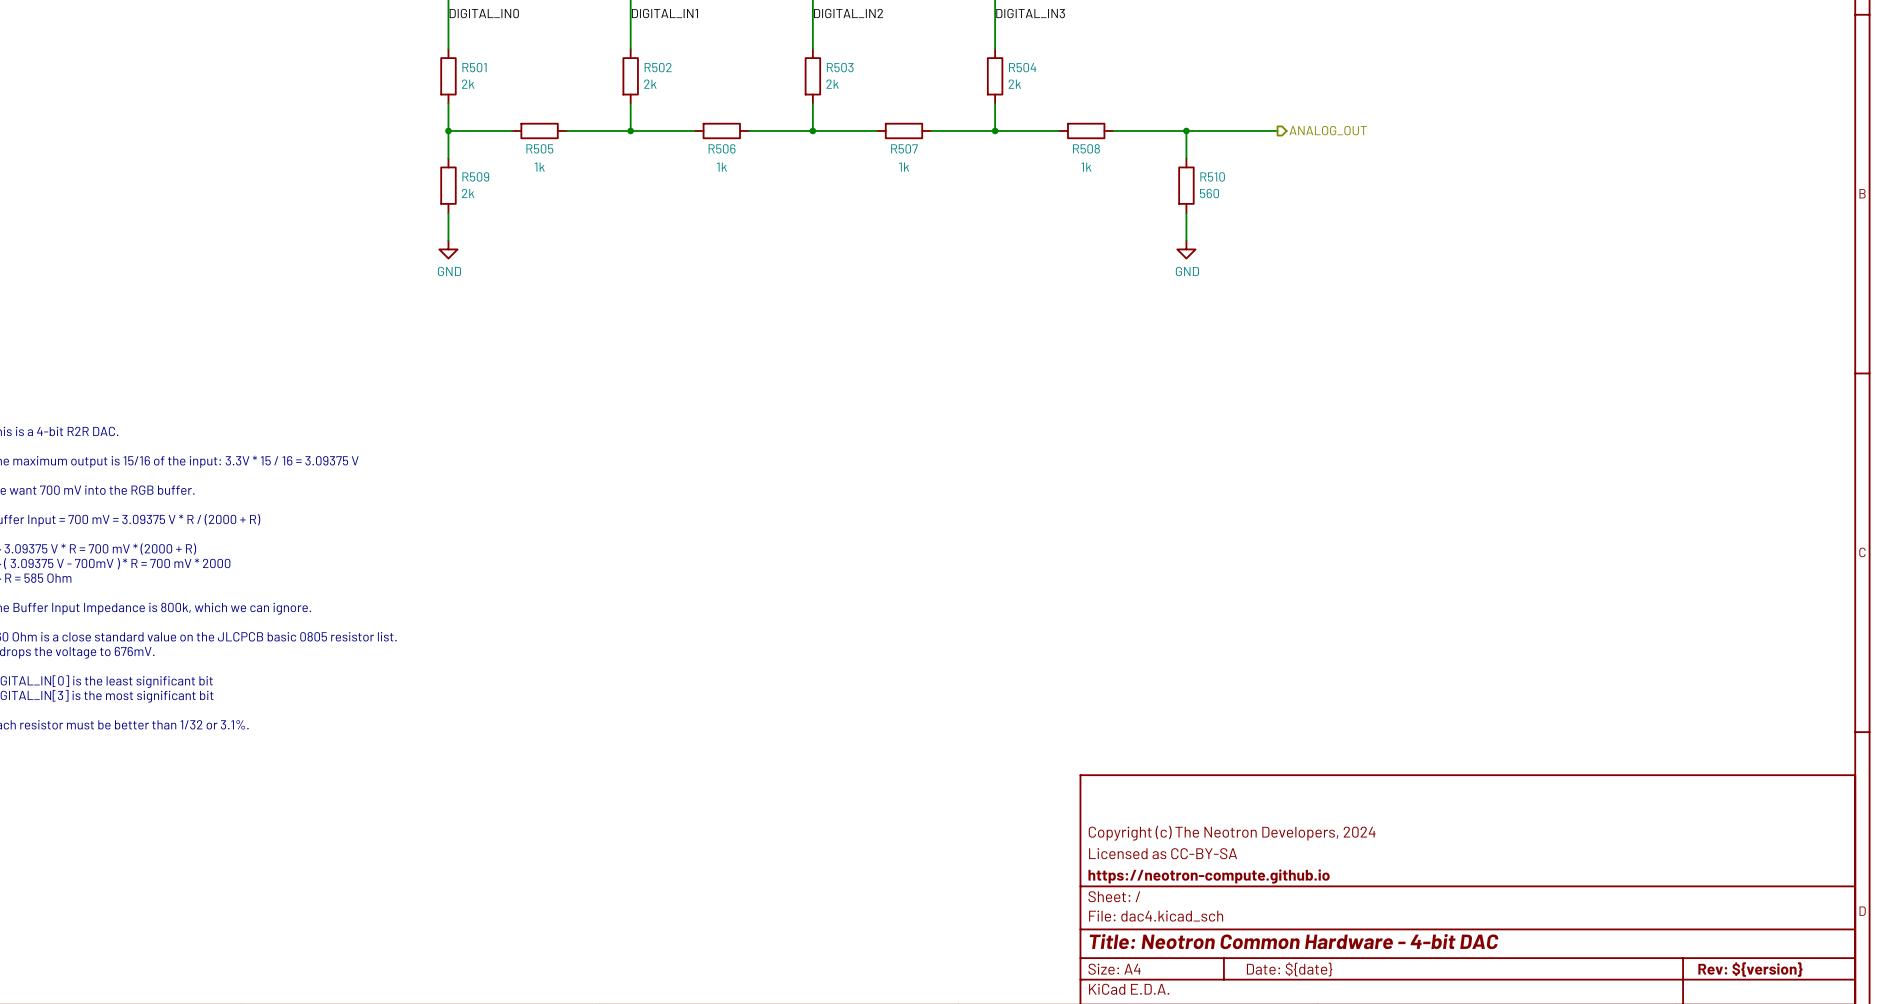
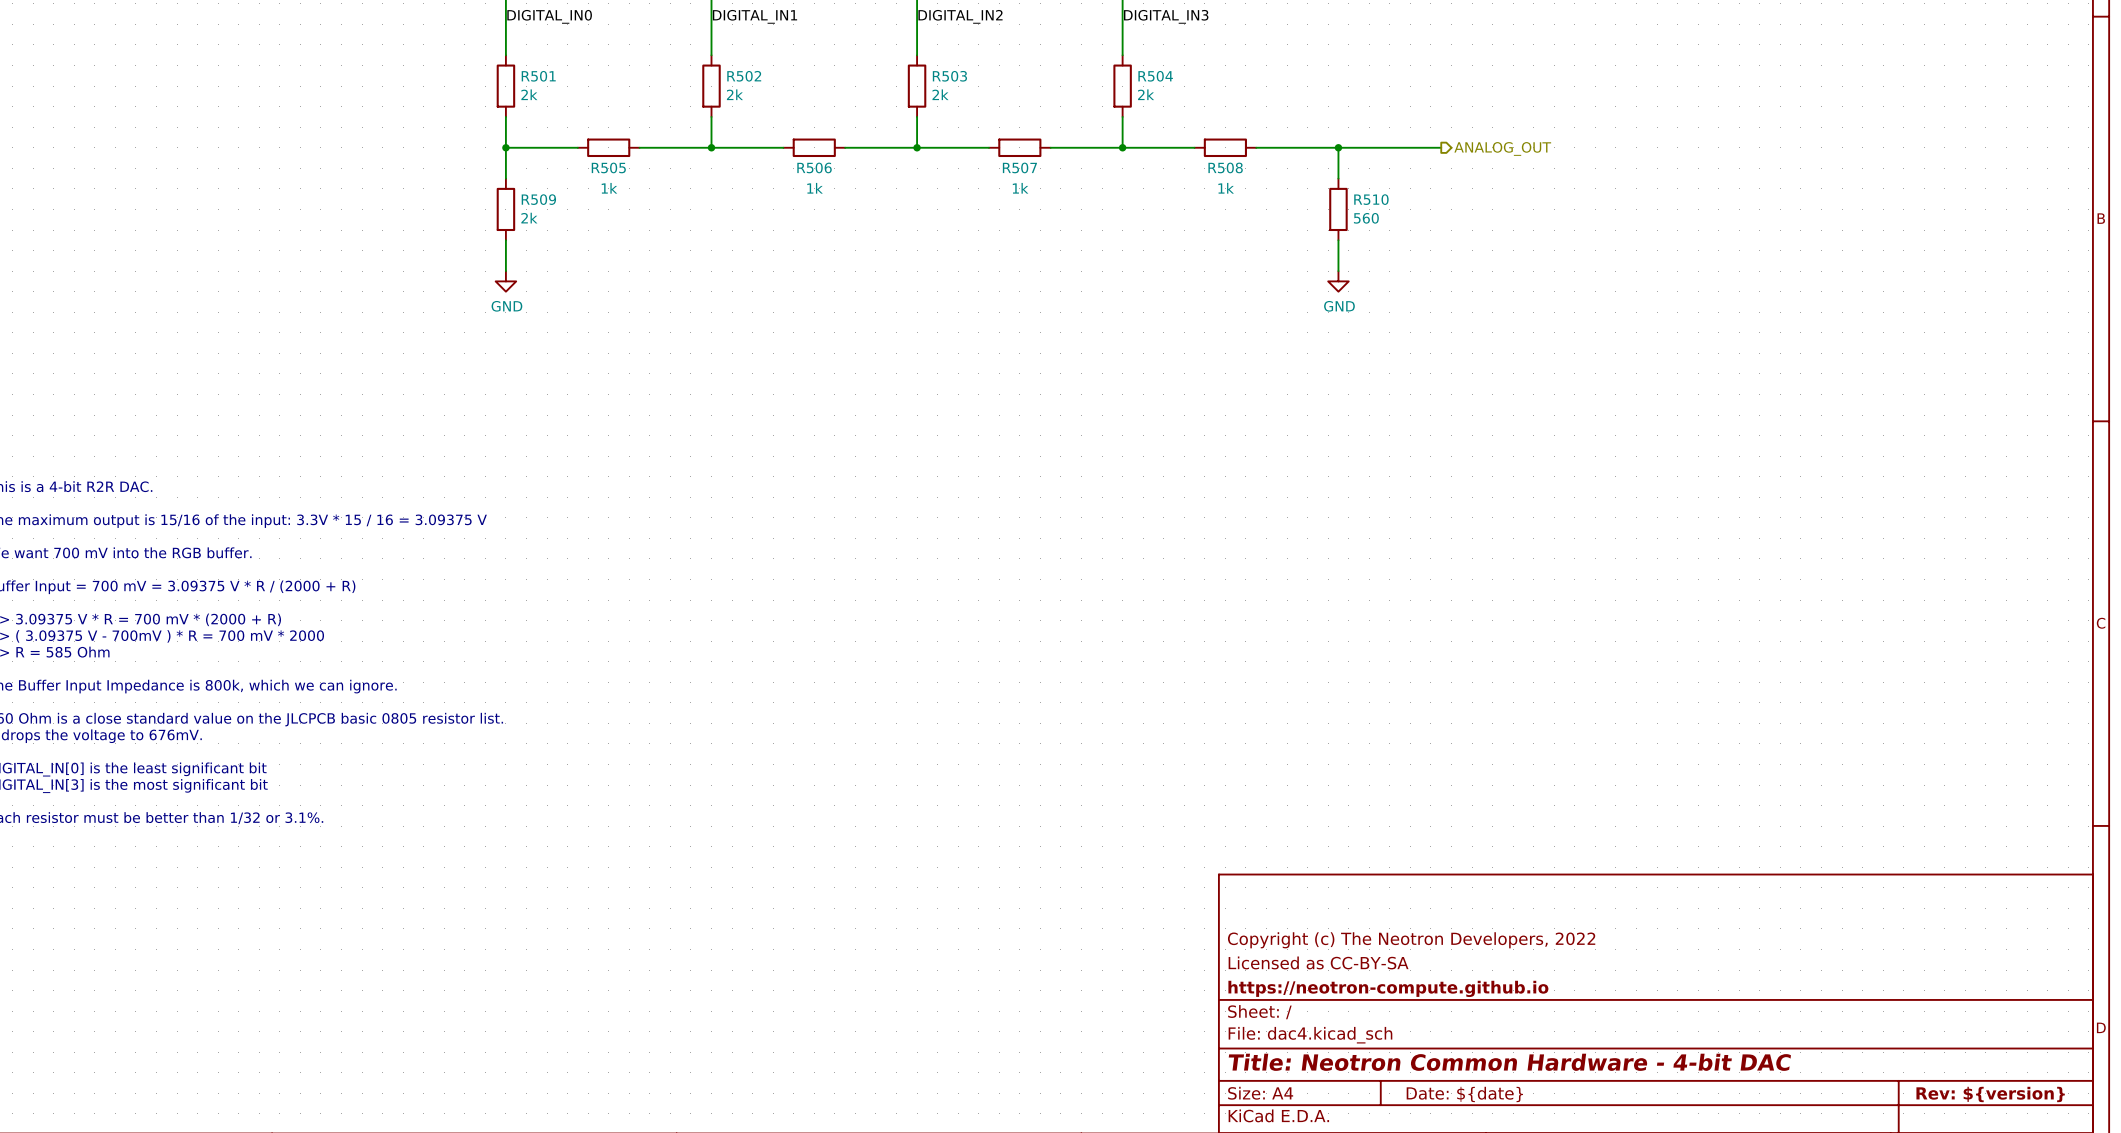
title block: Copyright (c) The Neotron Developers, 2024 (1232, 833) -> Copyright (c) The Neotron Developers, 2022 (1411, 940)

